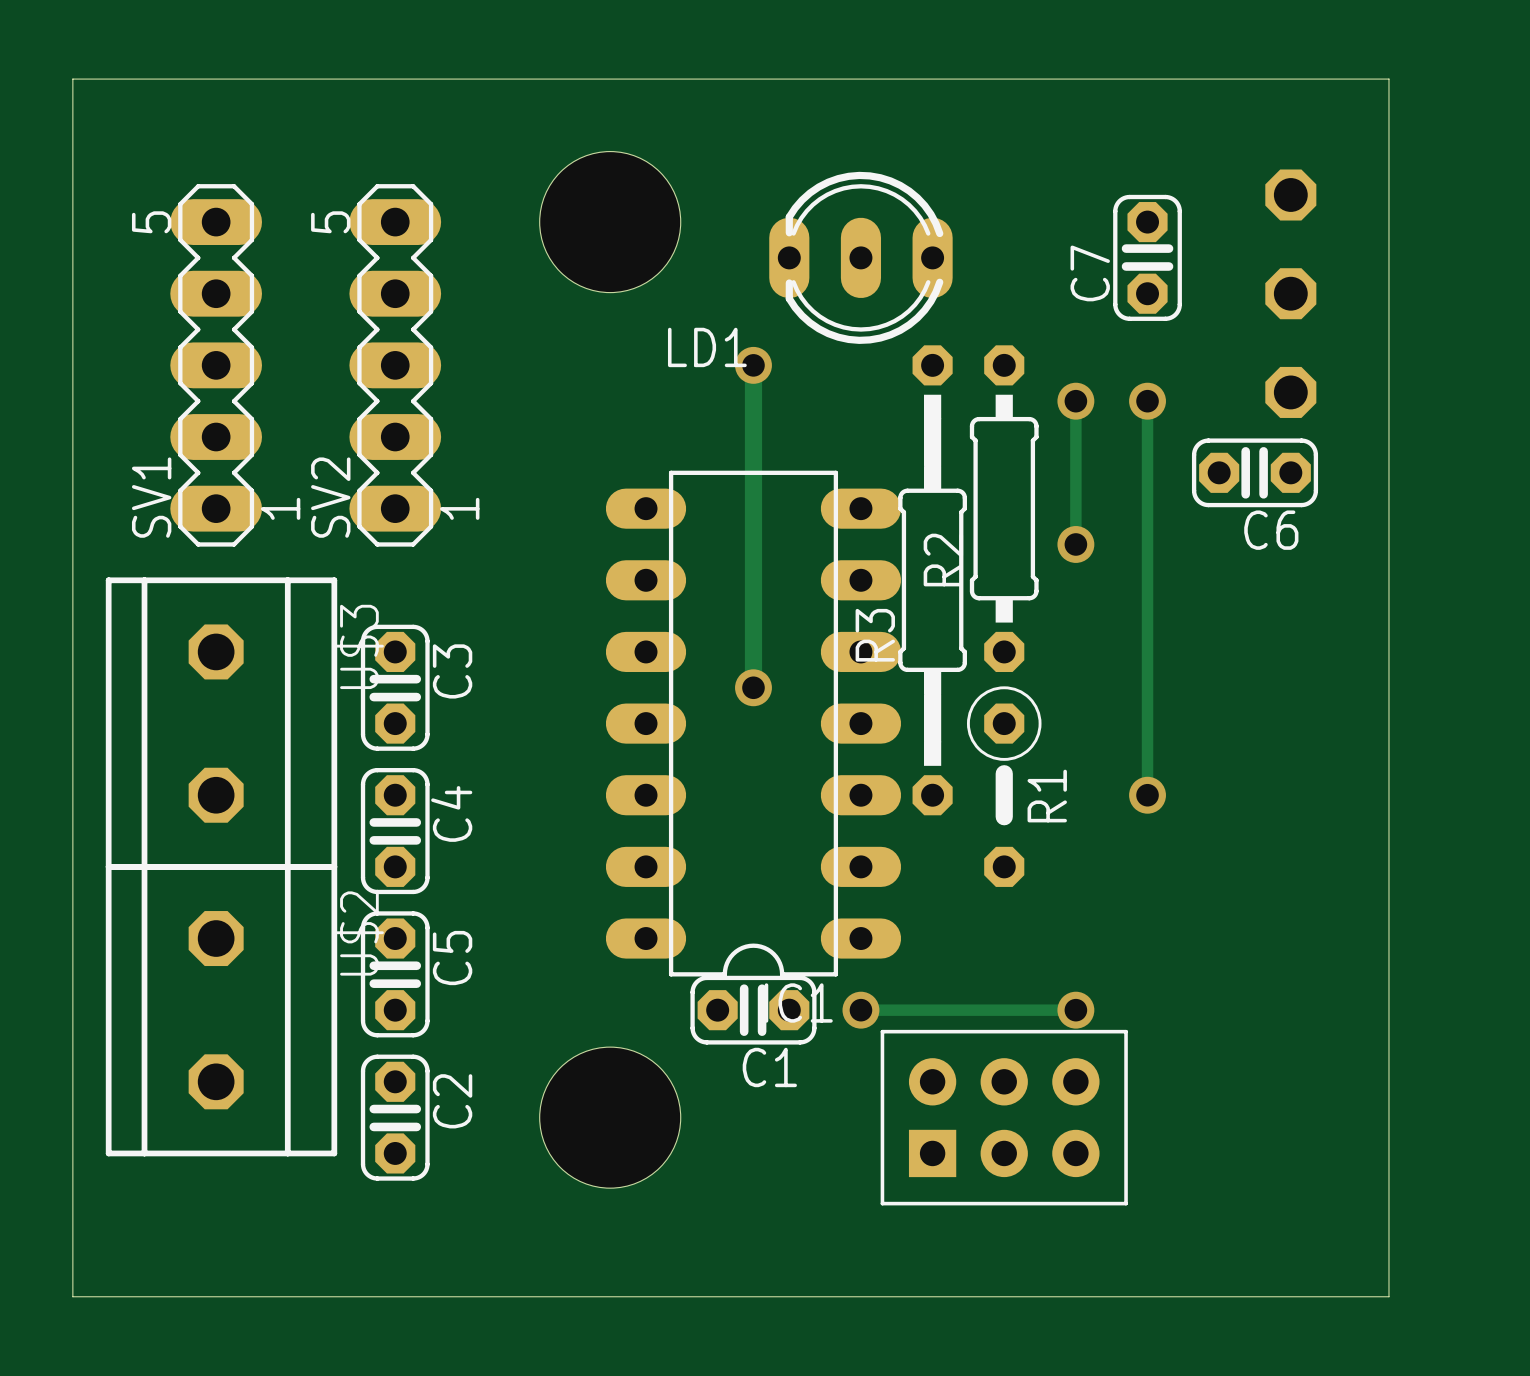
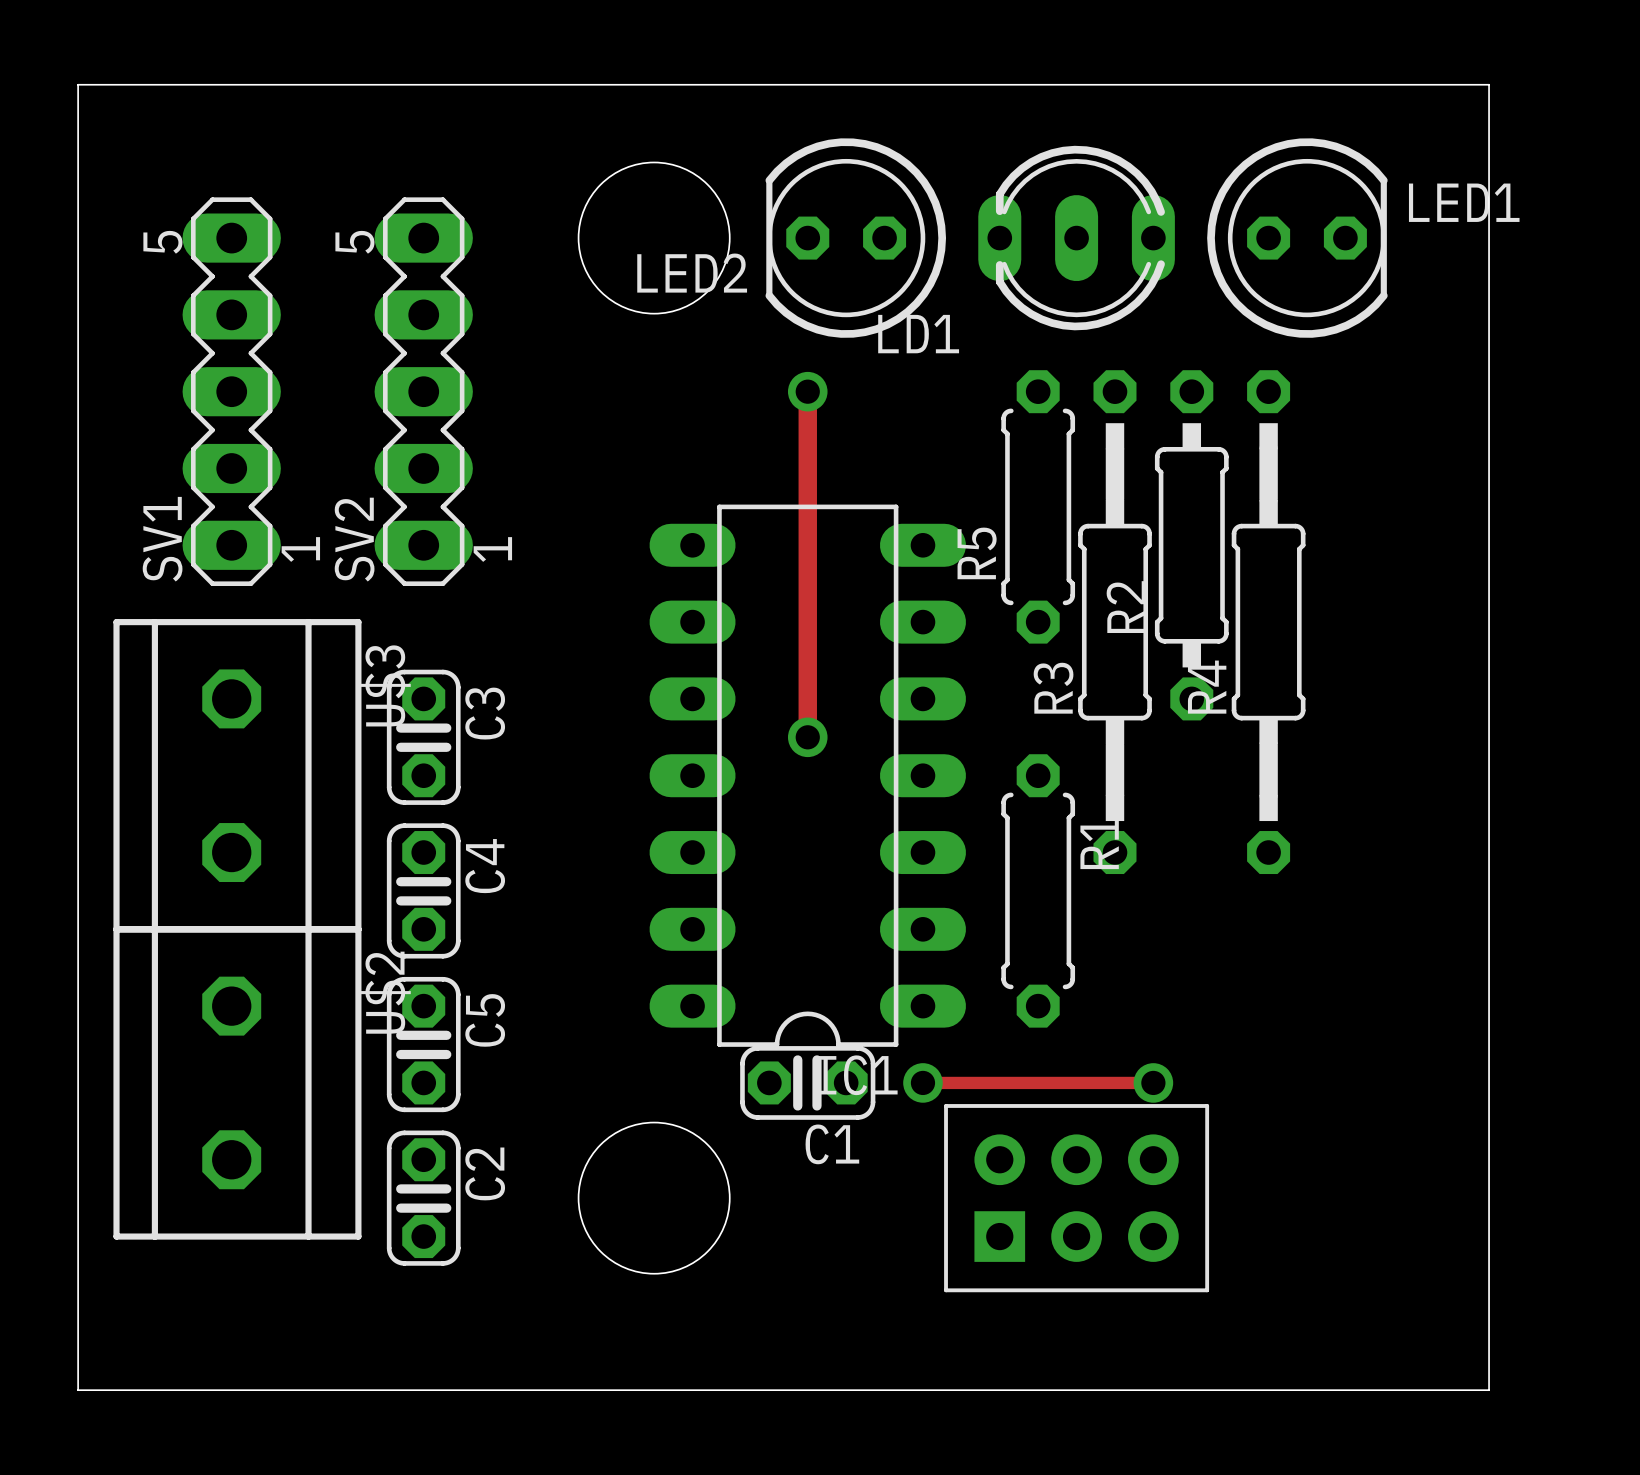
LED2: none -> (855, 238)
LED1: none -> (1297, 238)
LD1 position: (860, 257) -> (1076, 238)
C7: (1147, 257) -> none
part: (1290, 293) -> none
track: (1075, 401) (1075, 544) -> none
via: (1075, 401) -> none
track: (1147, 401) (1147, 795) -> none
via: (1147, 401) -> none
R5: none -> (1038, 506)
C6: (1255, 472) -> none
R2 position: (1004, 508) -> (1191, 545)
via: (1075, 544) -> none
R3 position: (932, 580) -> (1114, 622)
R4: none -> (1268, 622)
R1 footprint: [966, 686, 1042, 887] -> [1001, 754, 1076, 1028]
via: (1147, 795) -> none

